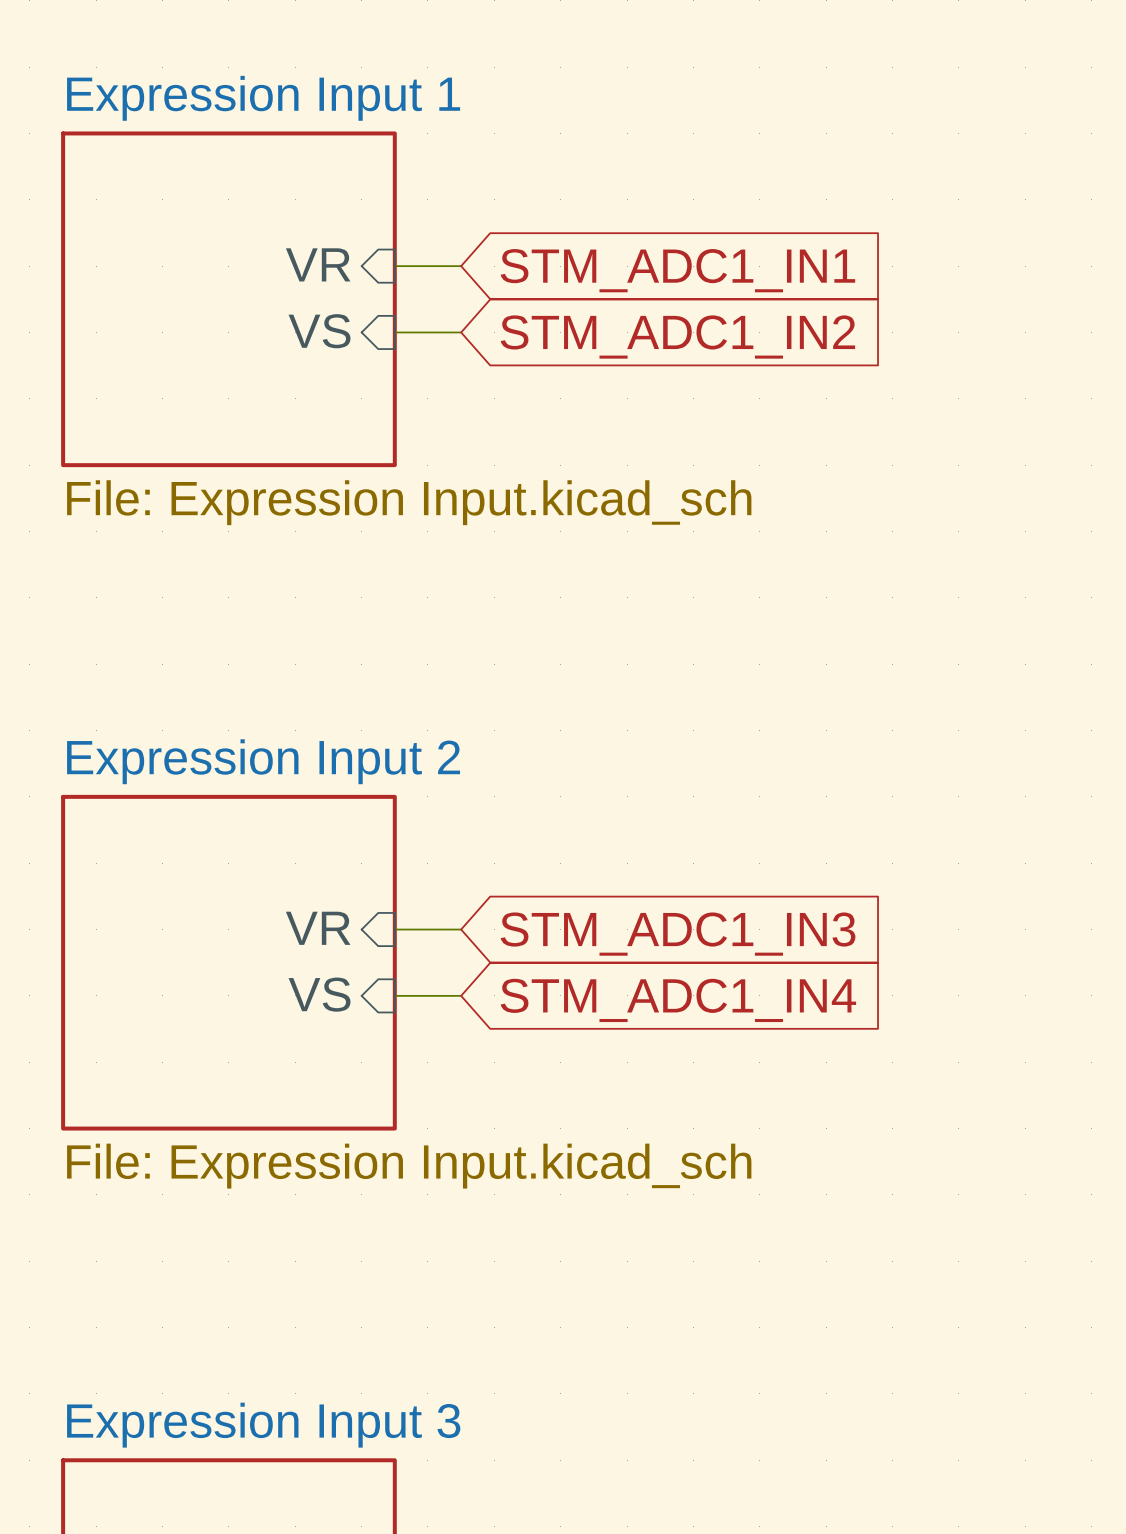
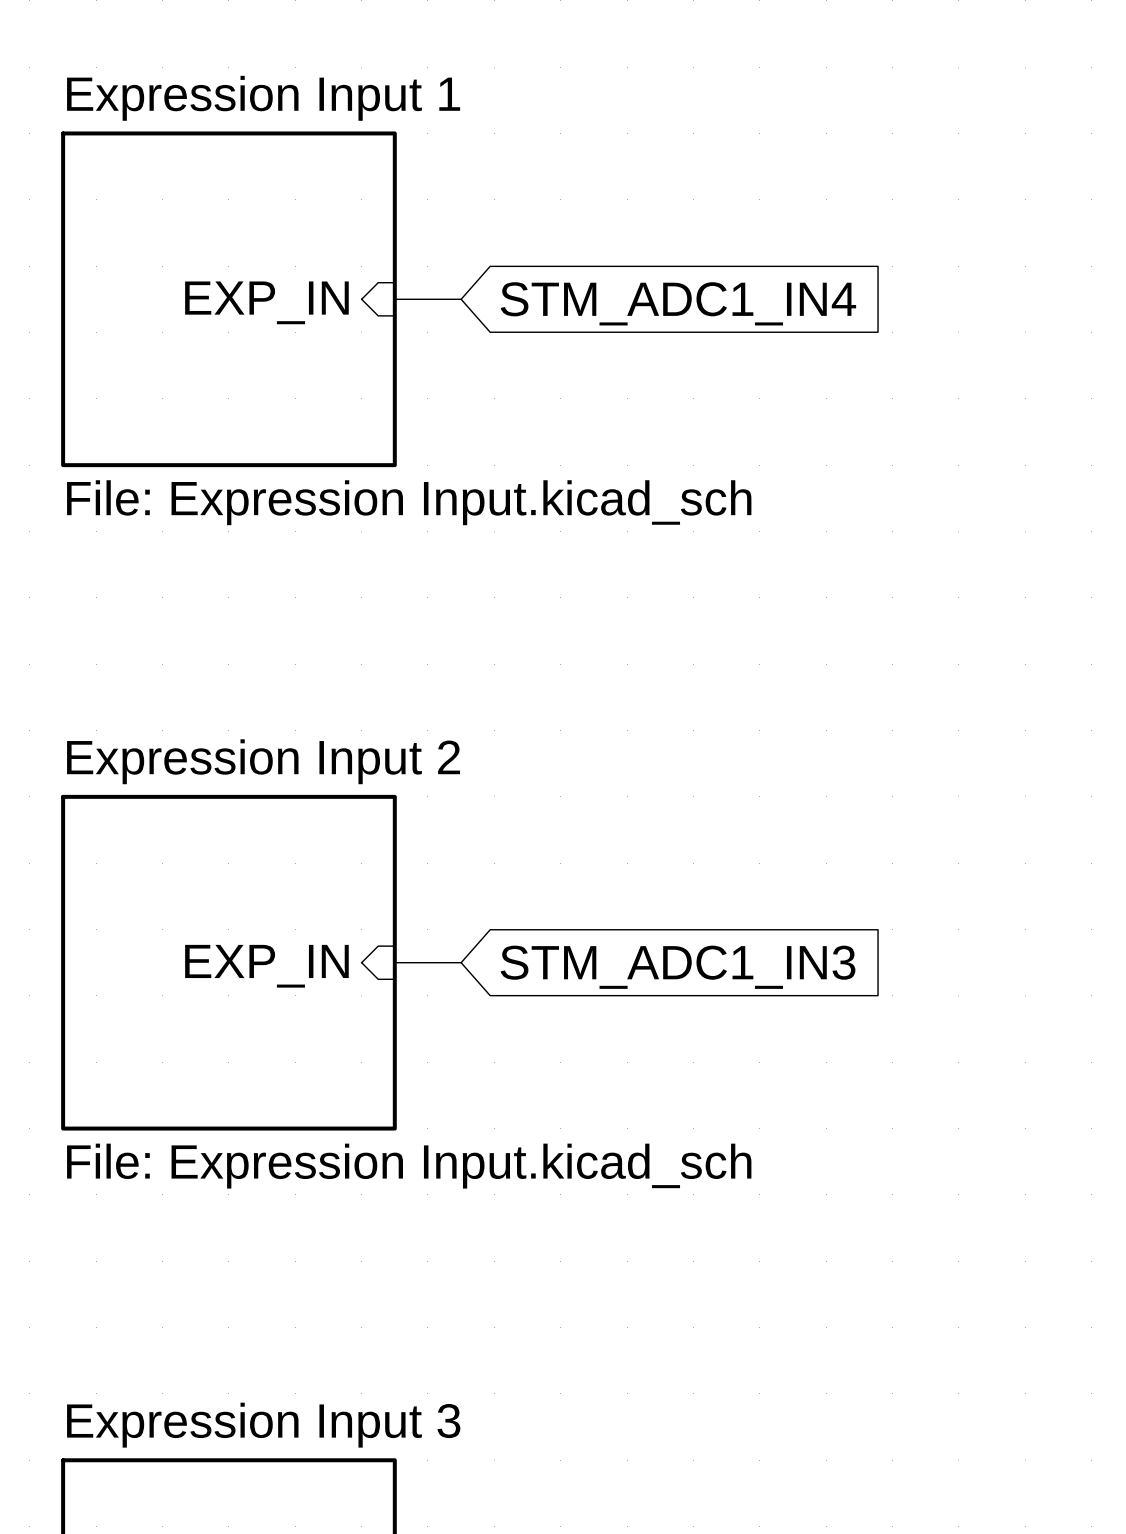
sheet pin: VR (318, 264) -> none
wire: (394, 266) (461, 266) -> (394, 299) (461, 299)
global label: STM_ADC1_IN1 (677, 270) -> none
sheet pin: none -> EXP_IN (266, 302)
global label: none -> STM_ADC1_IN4 (678, 303)
sheet pin: VS (319, 331) -> none
wire: (394, 332) (461, 332) -> none
global label: STM_ADC1_IN2 (677, 337) -> none
sheet pin: VR (318, 928) -> none
wire: (394, 929) (461, 929) -> (394, 962) (461, 962)
global label position: STM_ADC1_IN3 (678, 934) -> STM_ADC1_IN3 (678, 967)
sheet pin: none -> EXP_IN (266, 966)
sheet pin: VS (319, 994) -> none
wire: (394, 995) (461, 995) -> none
global label: STM_ADC1_IN4 (678, 1000) -> none

